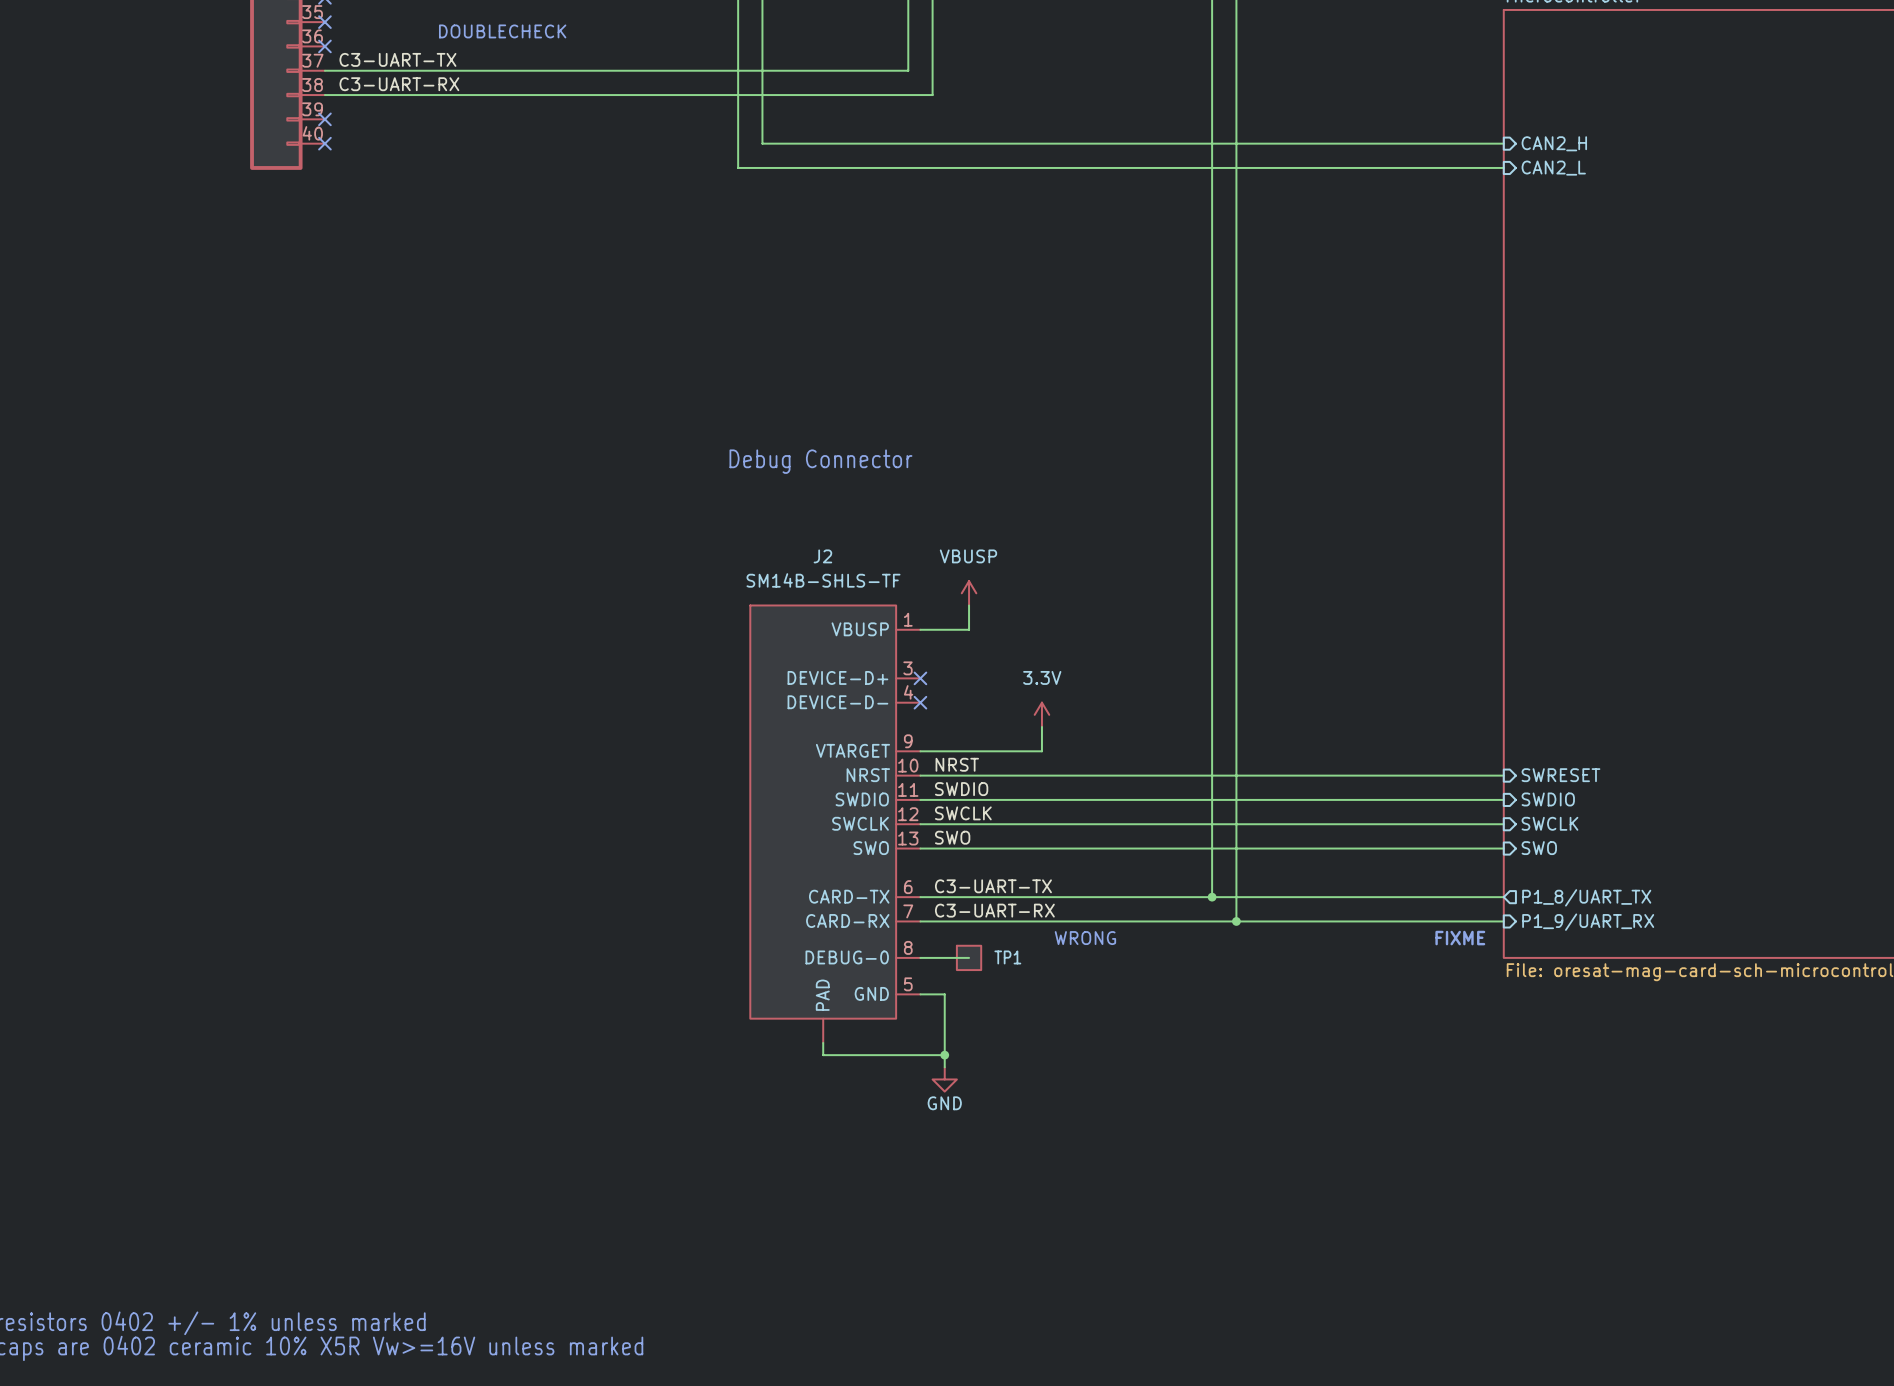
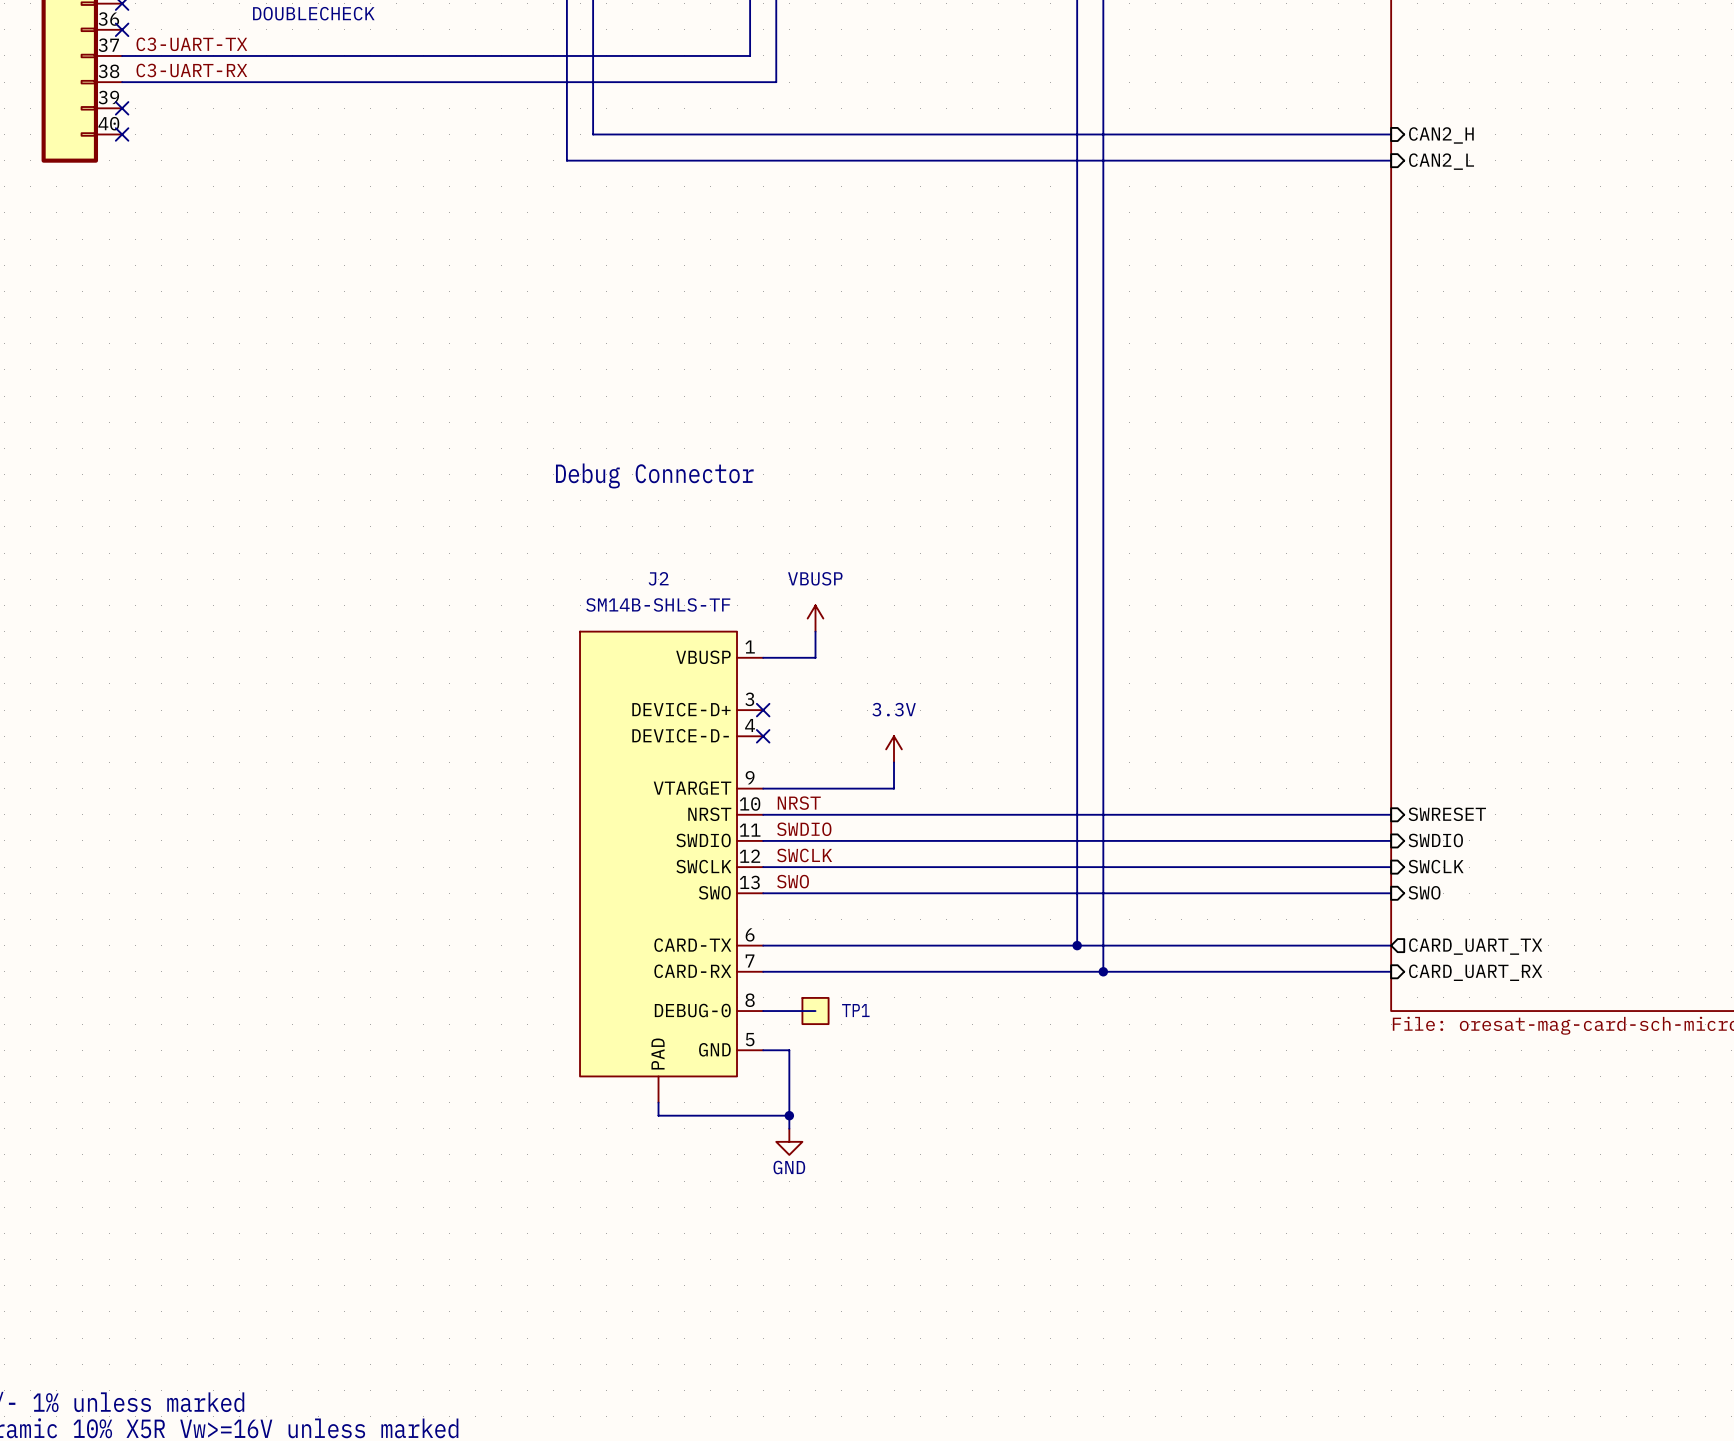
label: C3-UART-TX (993, 886) -> none
sheet pin: P1_8/UART_TX (1586, 897) -> CARD_UART_TX (1475, 946)
label: C3-UART-RX (994, 910) -> none
sheet pin: P1_9/UART_RX (1588, 922) -> CARD_UART_RX (1475, 972)
text: WRONG (1085, 938) -> none
text: FIXME (1460, 938) -> none

